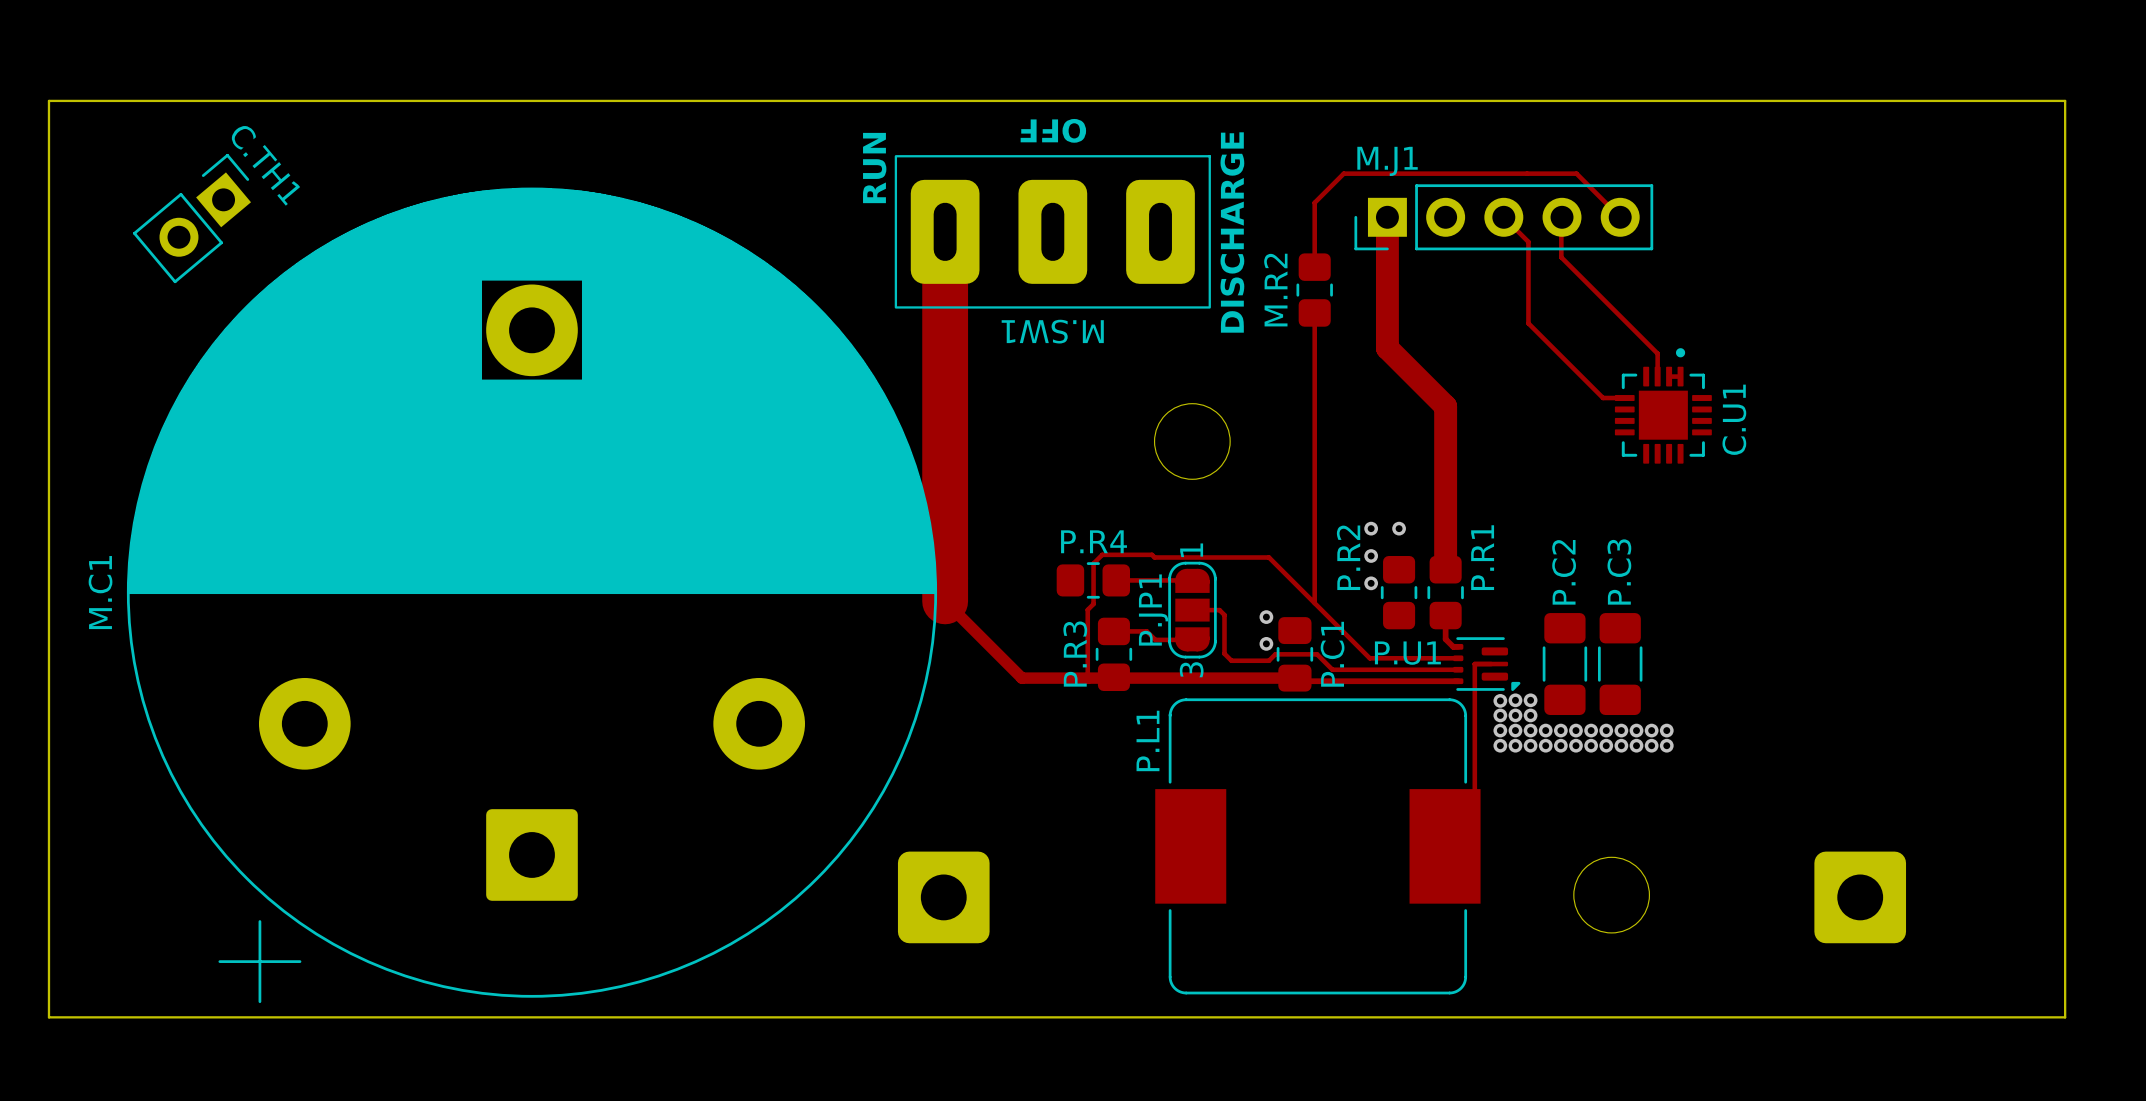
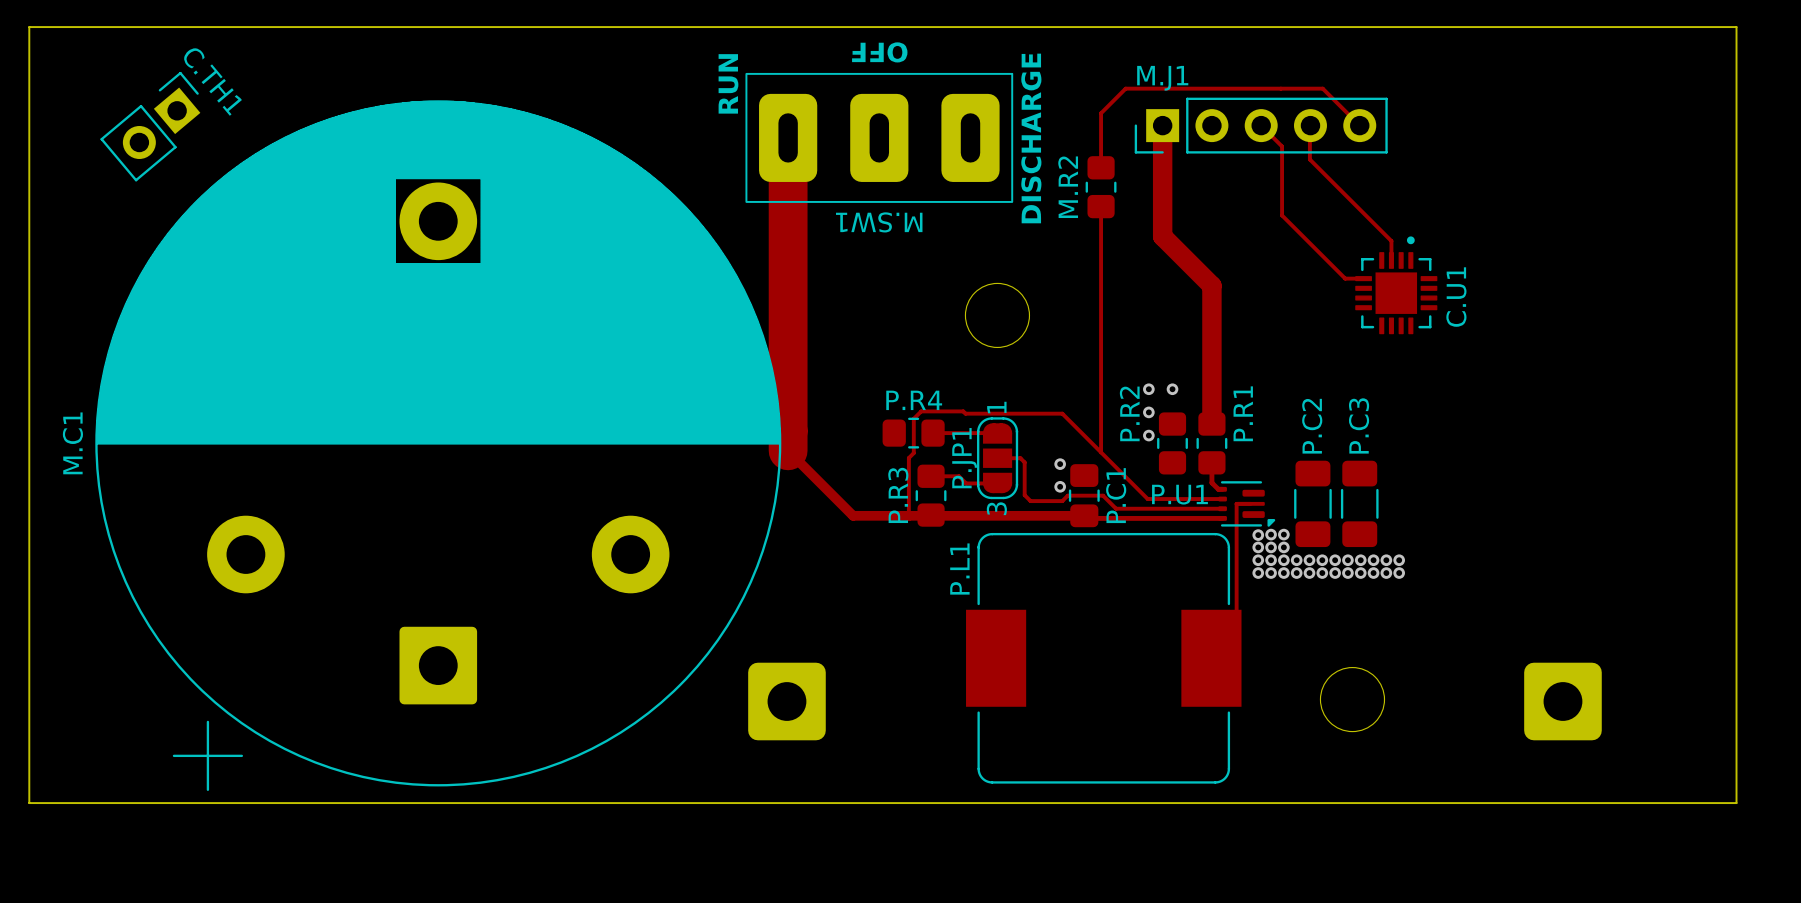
track: (1669, 376) (1680, 376) -> none

